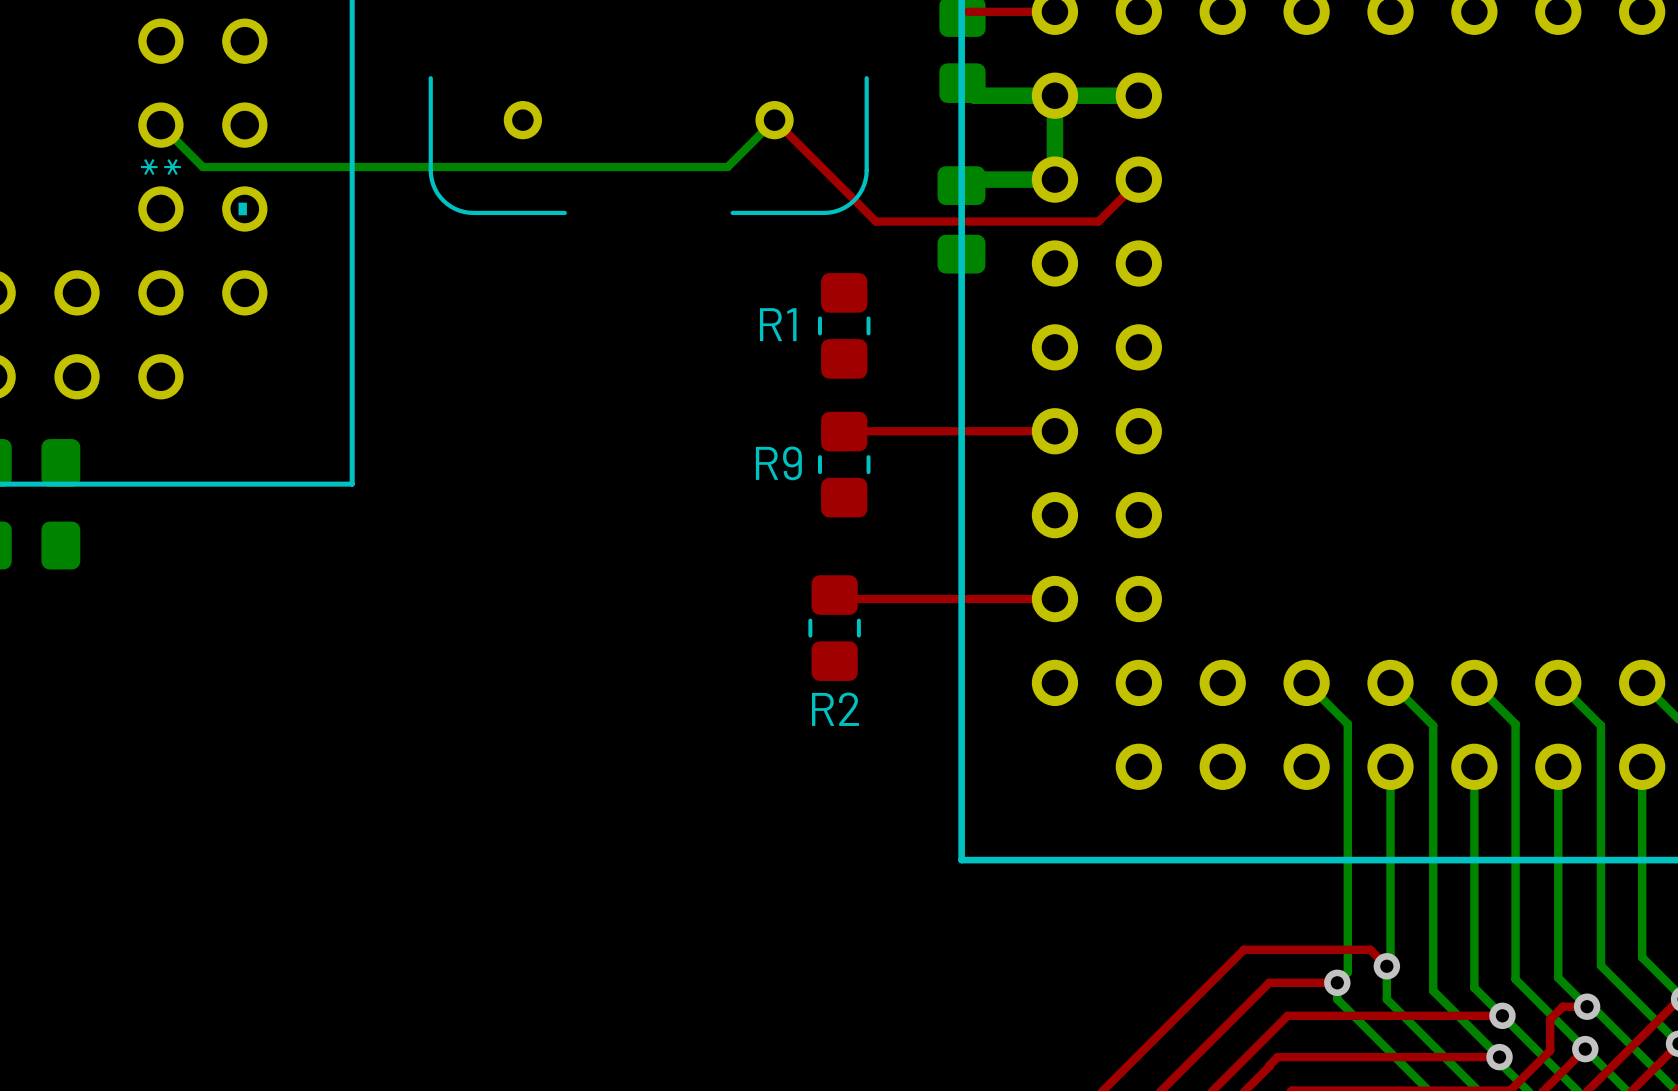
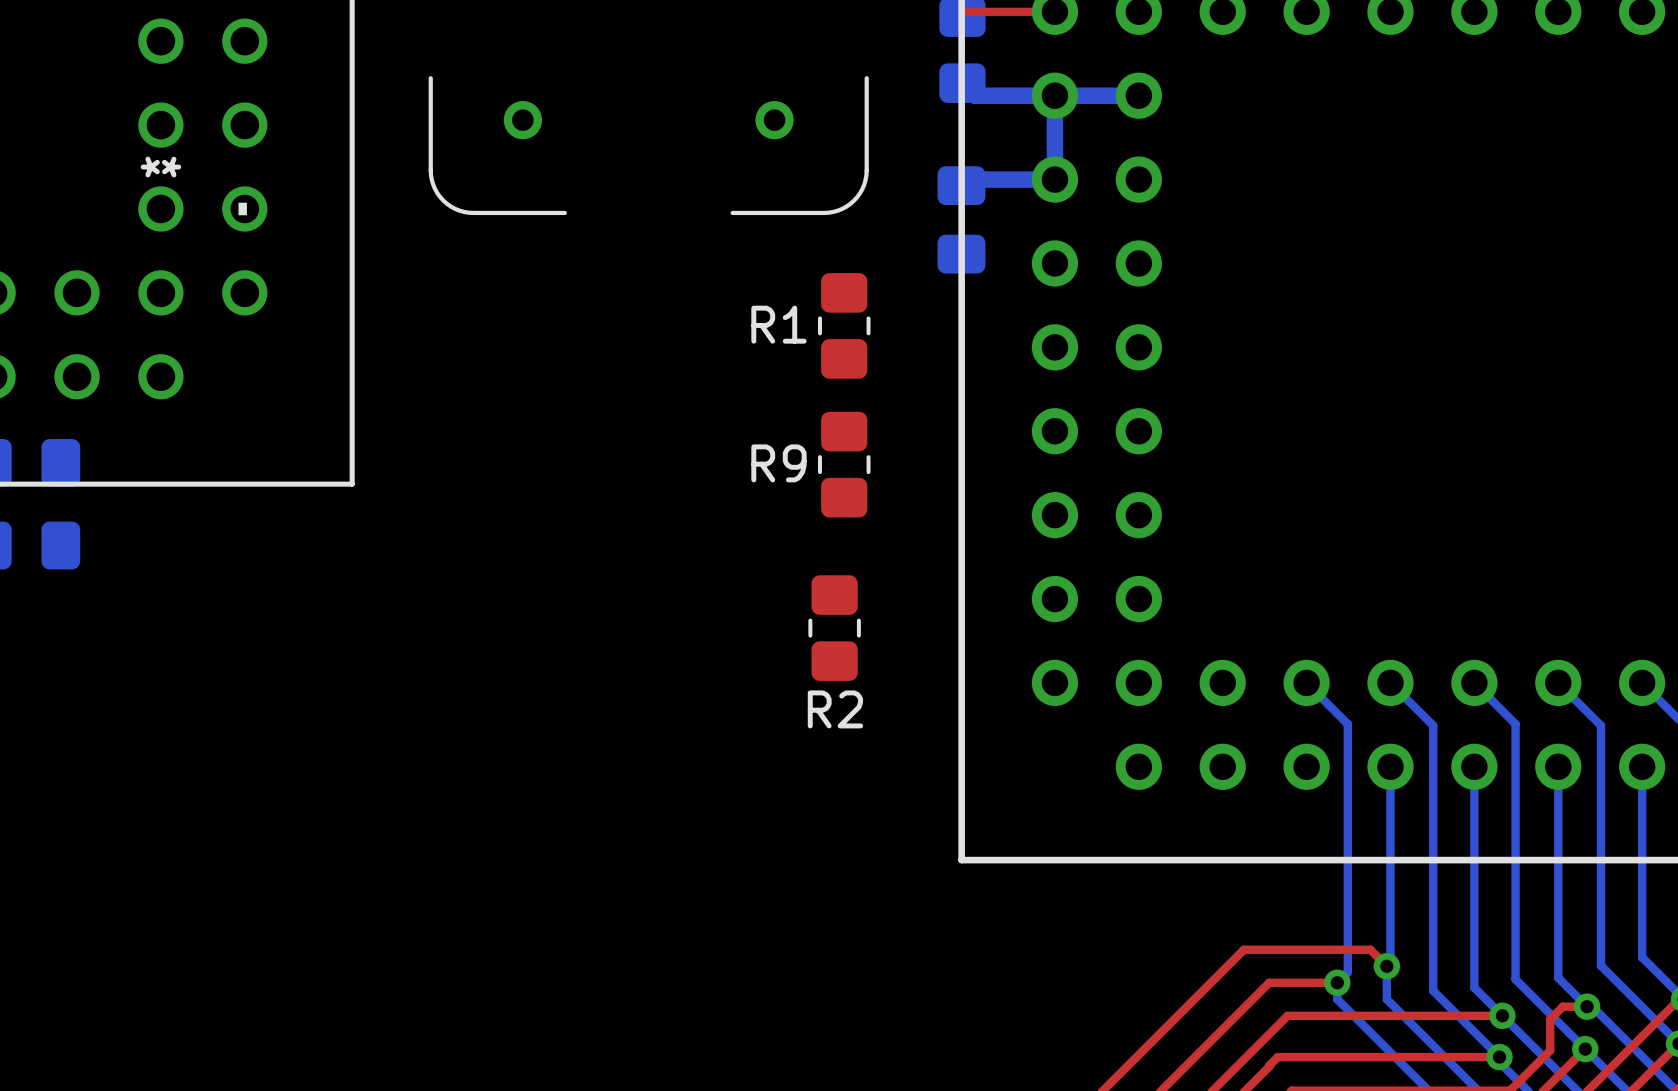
bottom track: (774, 120) (727, 167) (202, 167) (160, 125) -> none
top track: (774, 120) (875, 221) (1098, 221) (1138, 179) -> none
top track: (834, 431) (1054, 431) -> none
top track: (838, 599) (1054, 599) -> none

